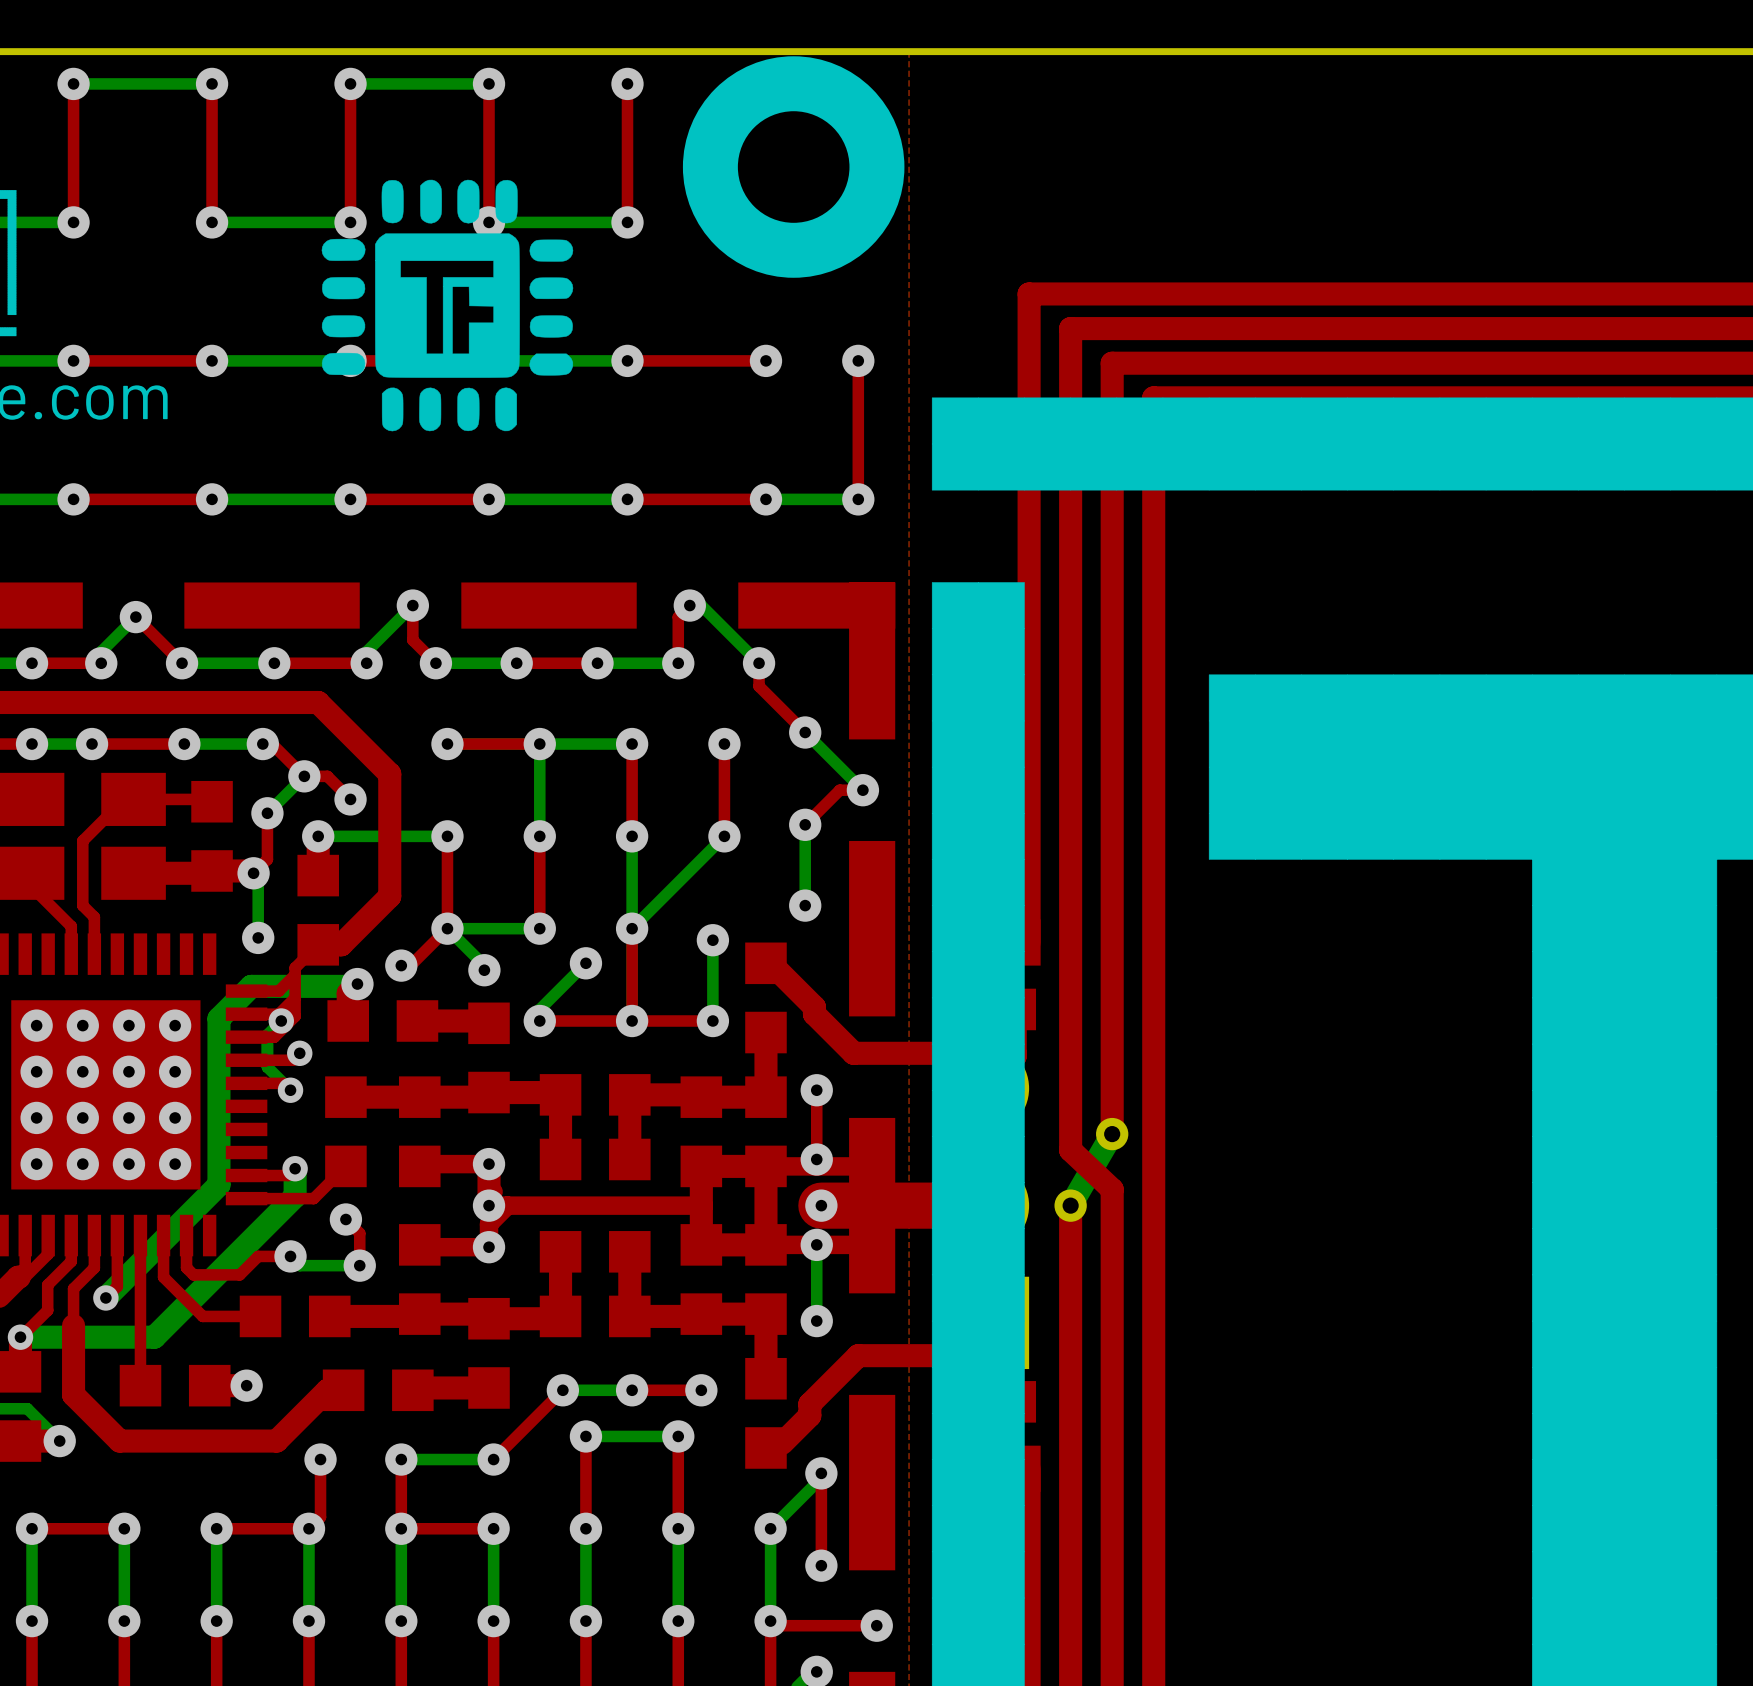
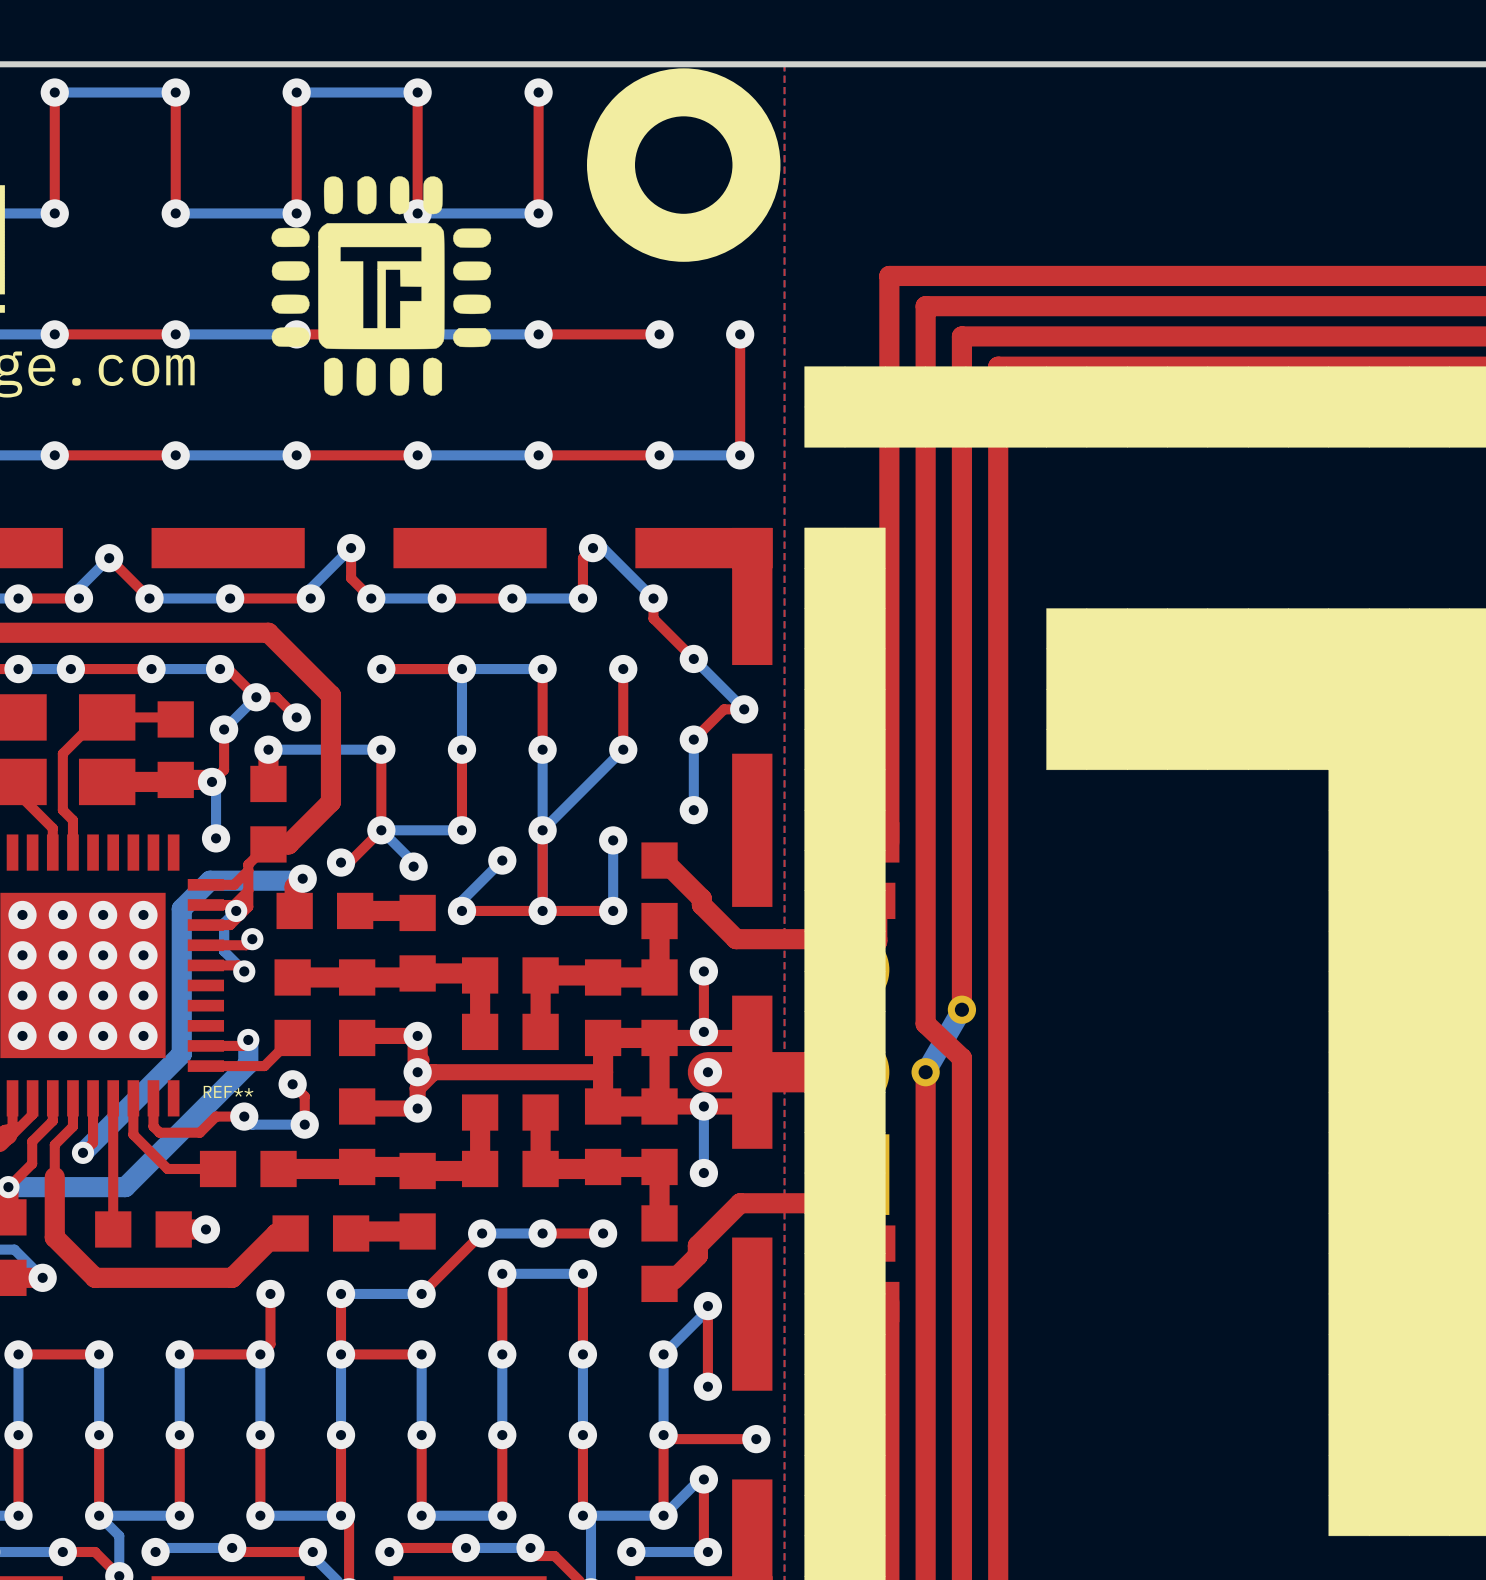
REF** name: none -> REF** (228, 1091)

